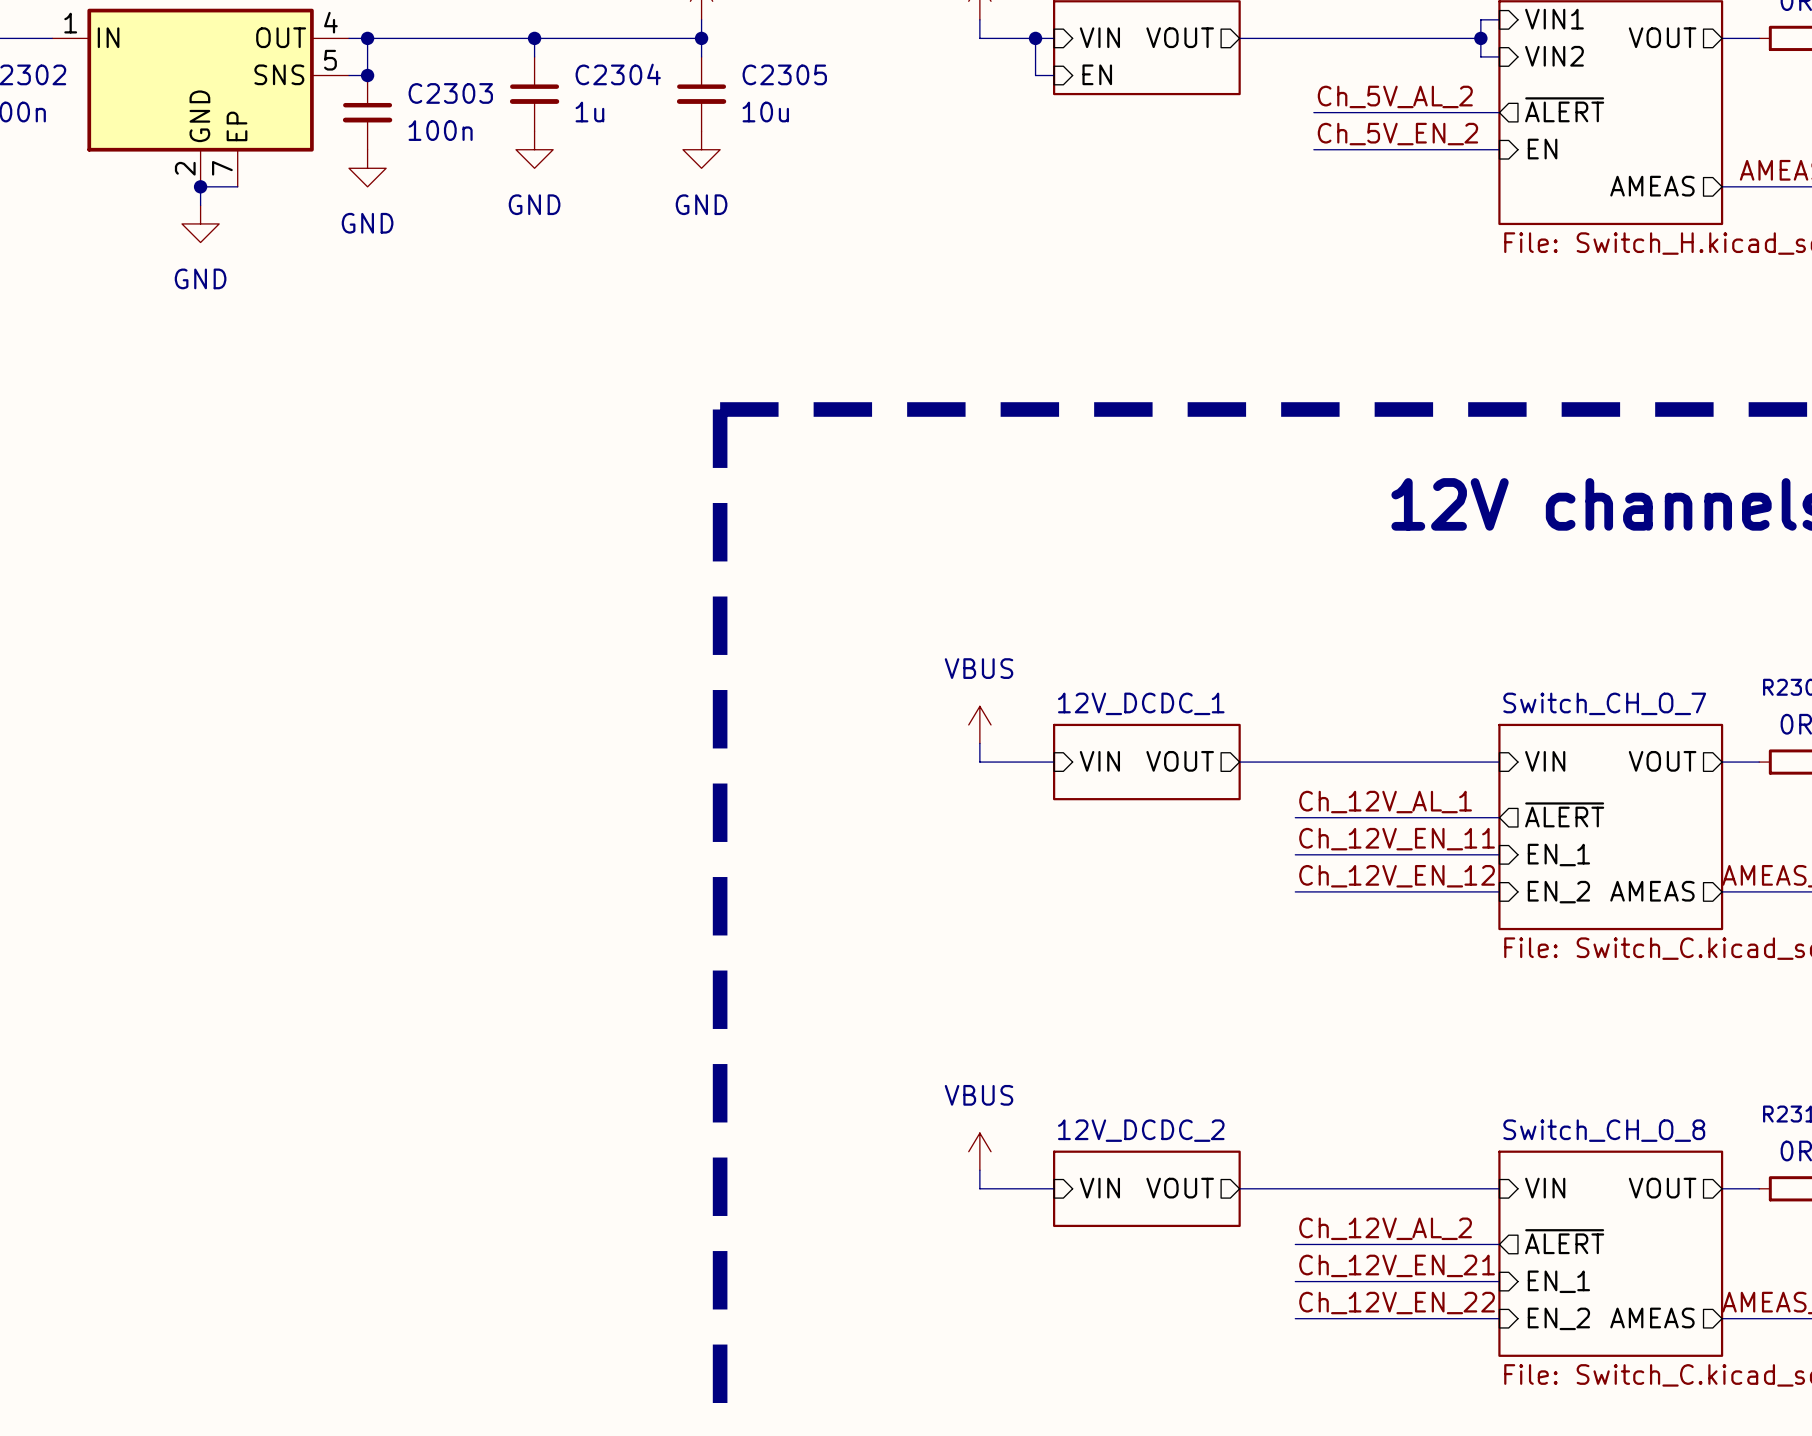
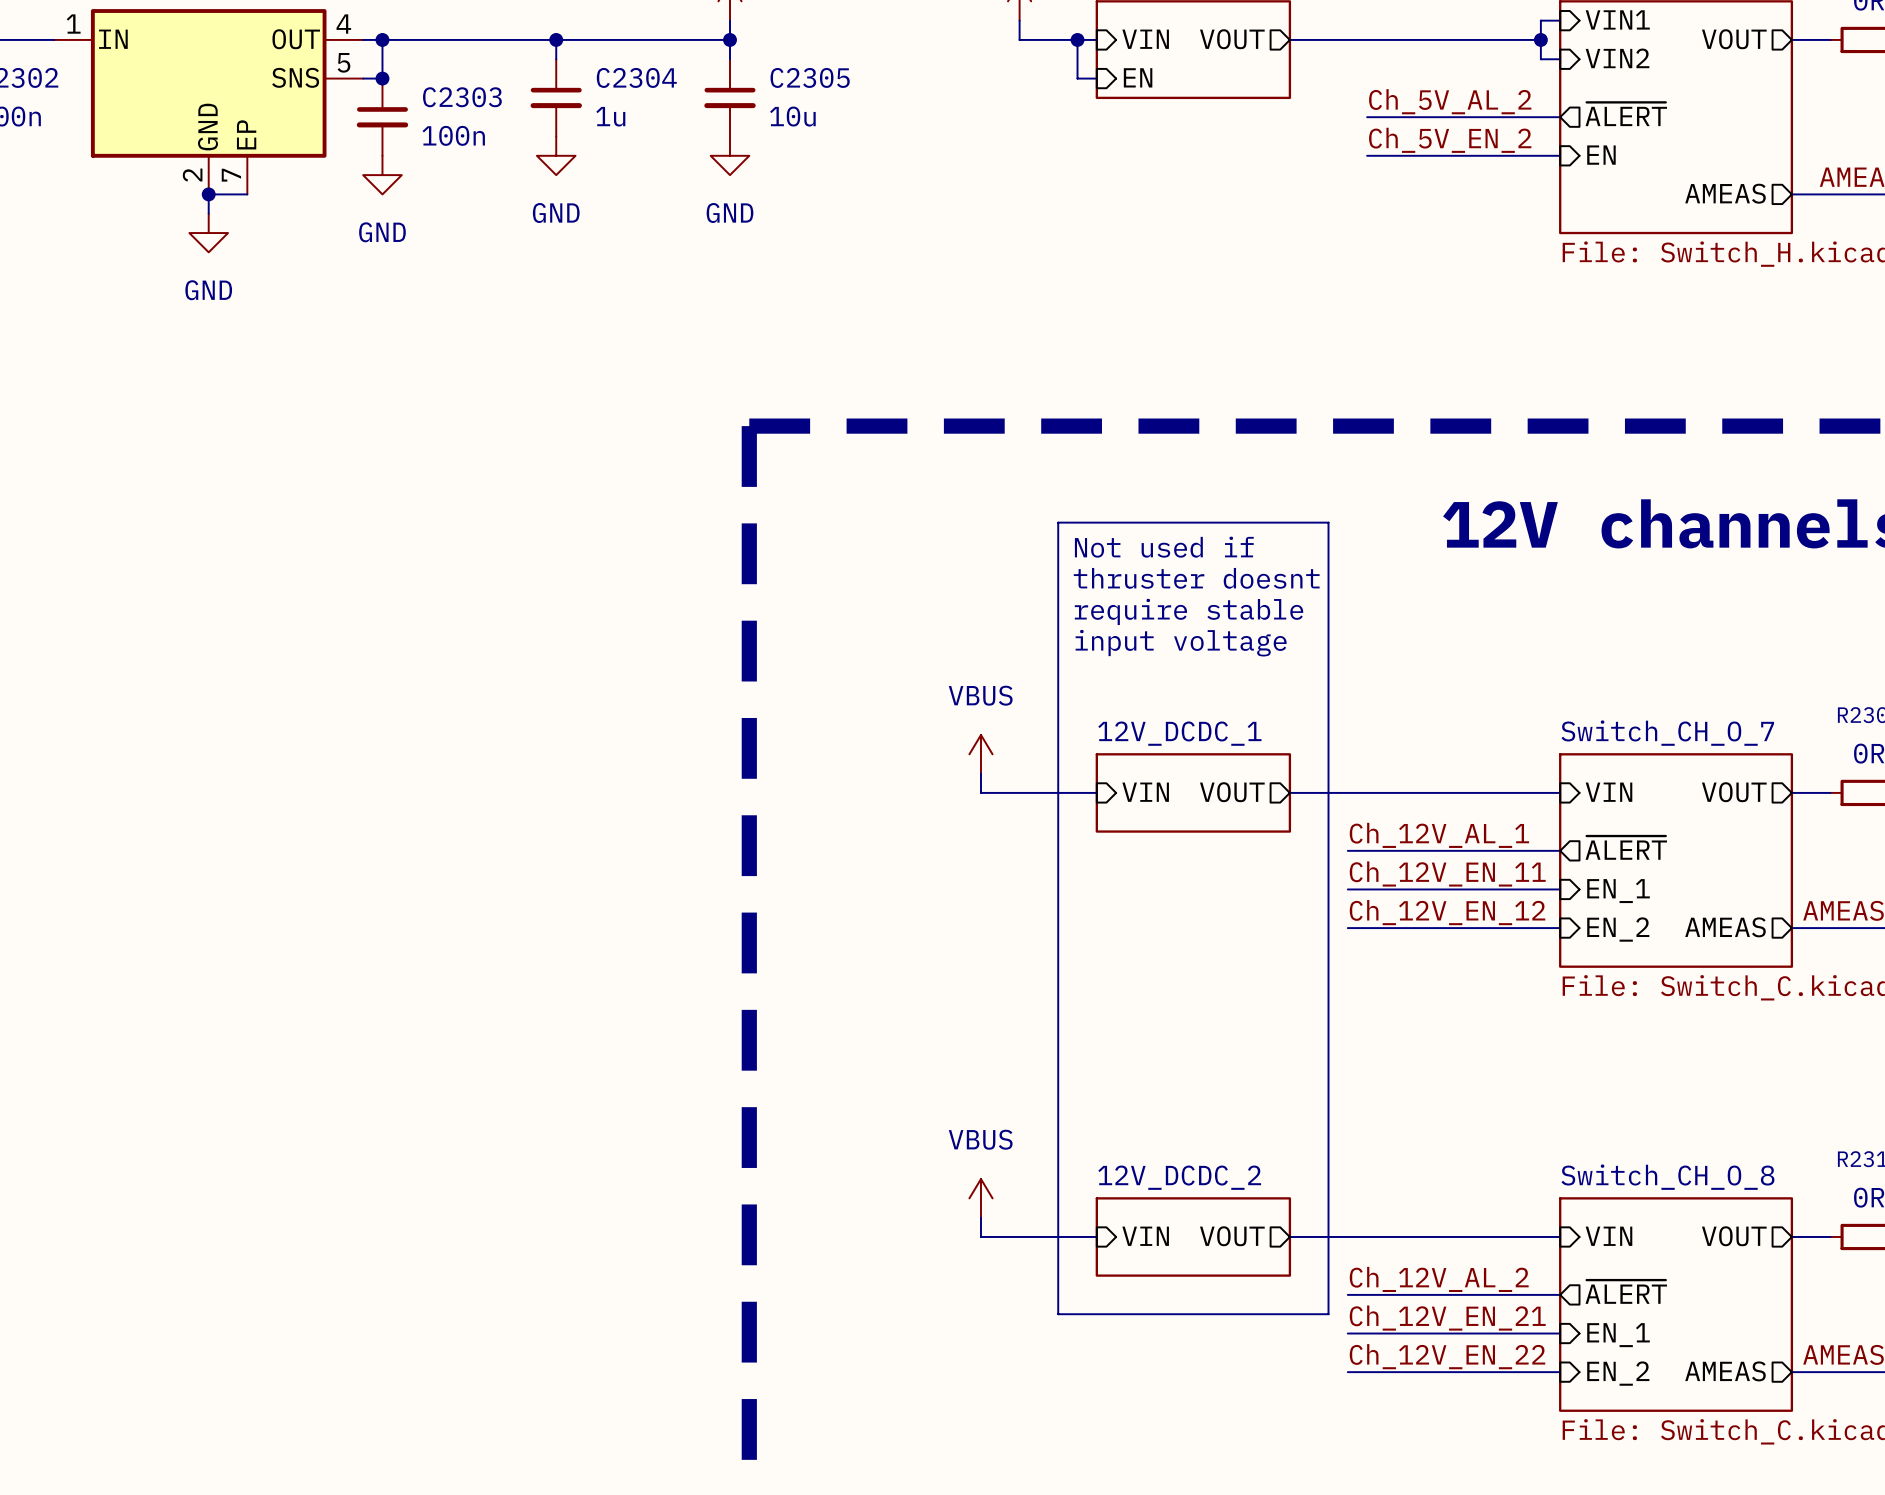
line: none -> (1058, 522) (1328, 522) (1328, 1314) (1058, 1314) (1058, 522)
text: none -> Not used if (1164, 547)
text: none -> thruster doesnt (1196, 578)
text: none -> require stable (1189, 611)
text: none -> input voltage (1181, 643)
power symbol position: VBUS (979, 724) -> VBUS (980, 754)
wire: (979, 743) (979, 762) -> (980, 773) (980, 792) (1019, 792)
power symbol position: VBUS (979, 1151) -> VBUS (980, 1198)
wire: (979, 1170) (979, 1188) -> (980, 1217) (980, 1236) (1019, 1236)

